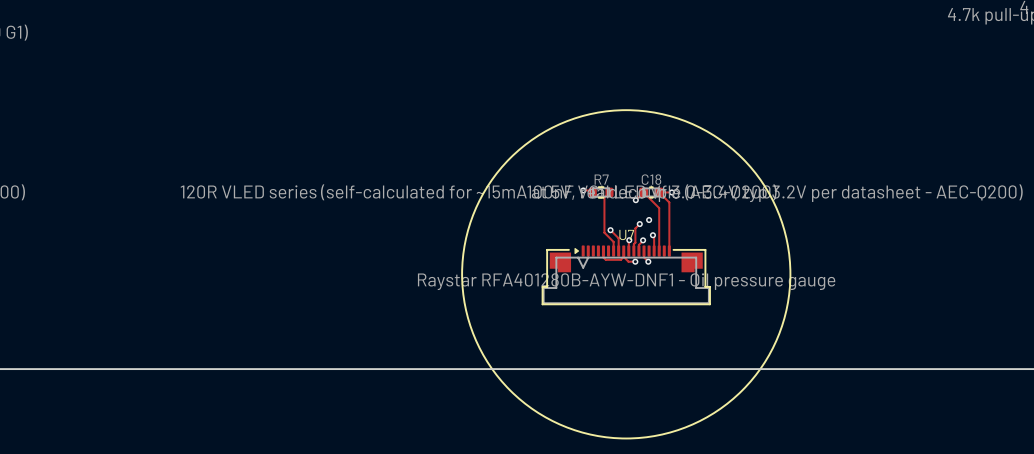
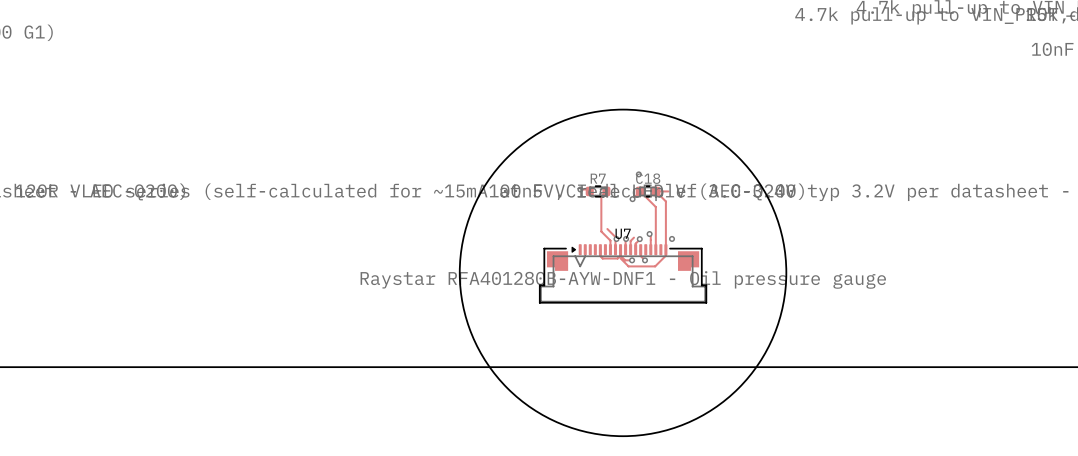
via: none -> (638, 174)
via: (671, 192) -> none
via: (649, 220) -> none
track: (639, 224) (635, 228) (633, 244) -> (633, 237) (630, 242)
via: (639, 224) -> none
via: (610, 230) -> none
via: none -> (616, 238)
via: none -> (672, 238)
track: none -> (665, 249) (665, 255) (655, 266) (628, 266) (620, 258)

